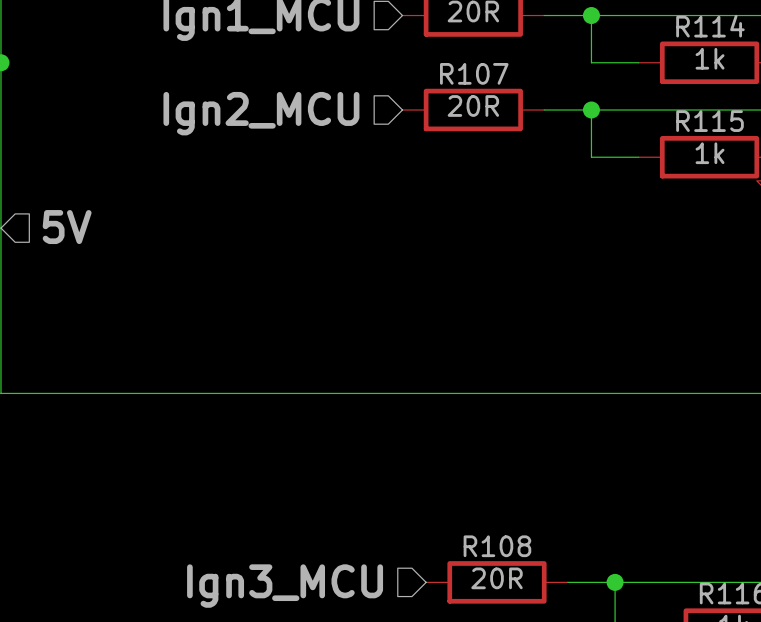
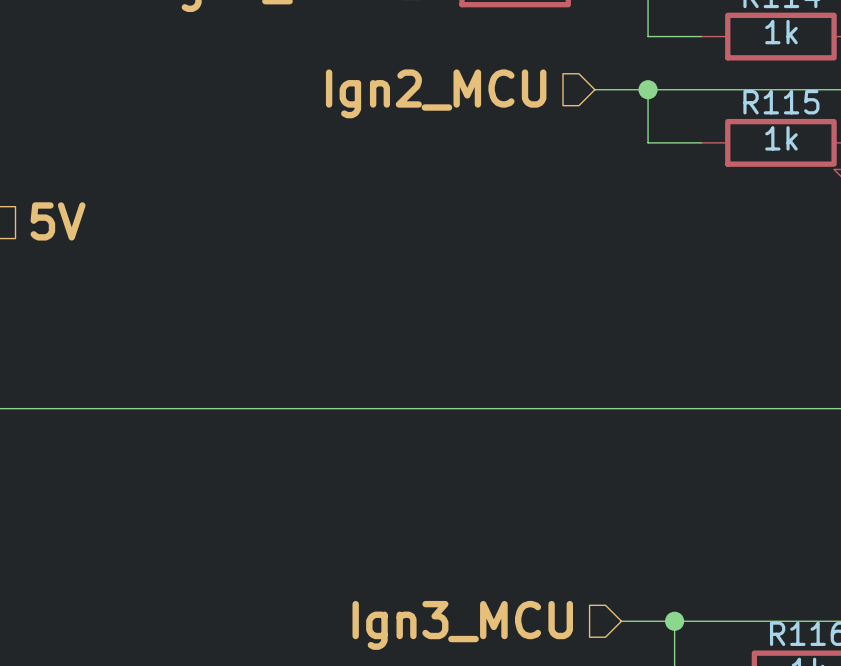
R107: 20R (473, 110) -> none
hierarchical label position: Ign2_MCU (261, 113) -> Ign2_MCU (436, 93)
R108: 20R (496, 582) -> none
hierarchical label position: Ign3_MCU (285, 586) -> Ign3_MCU (462, 625)

